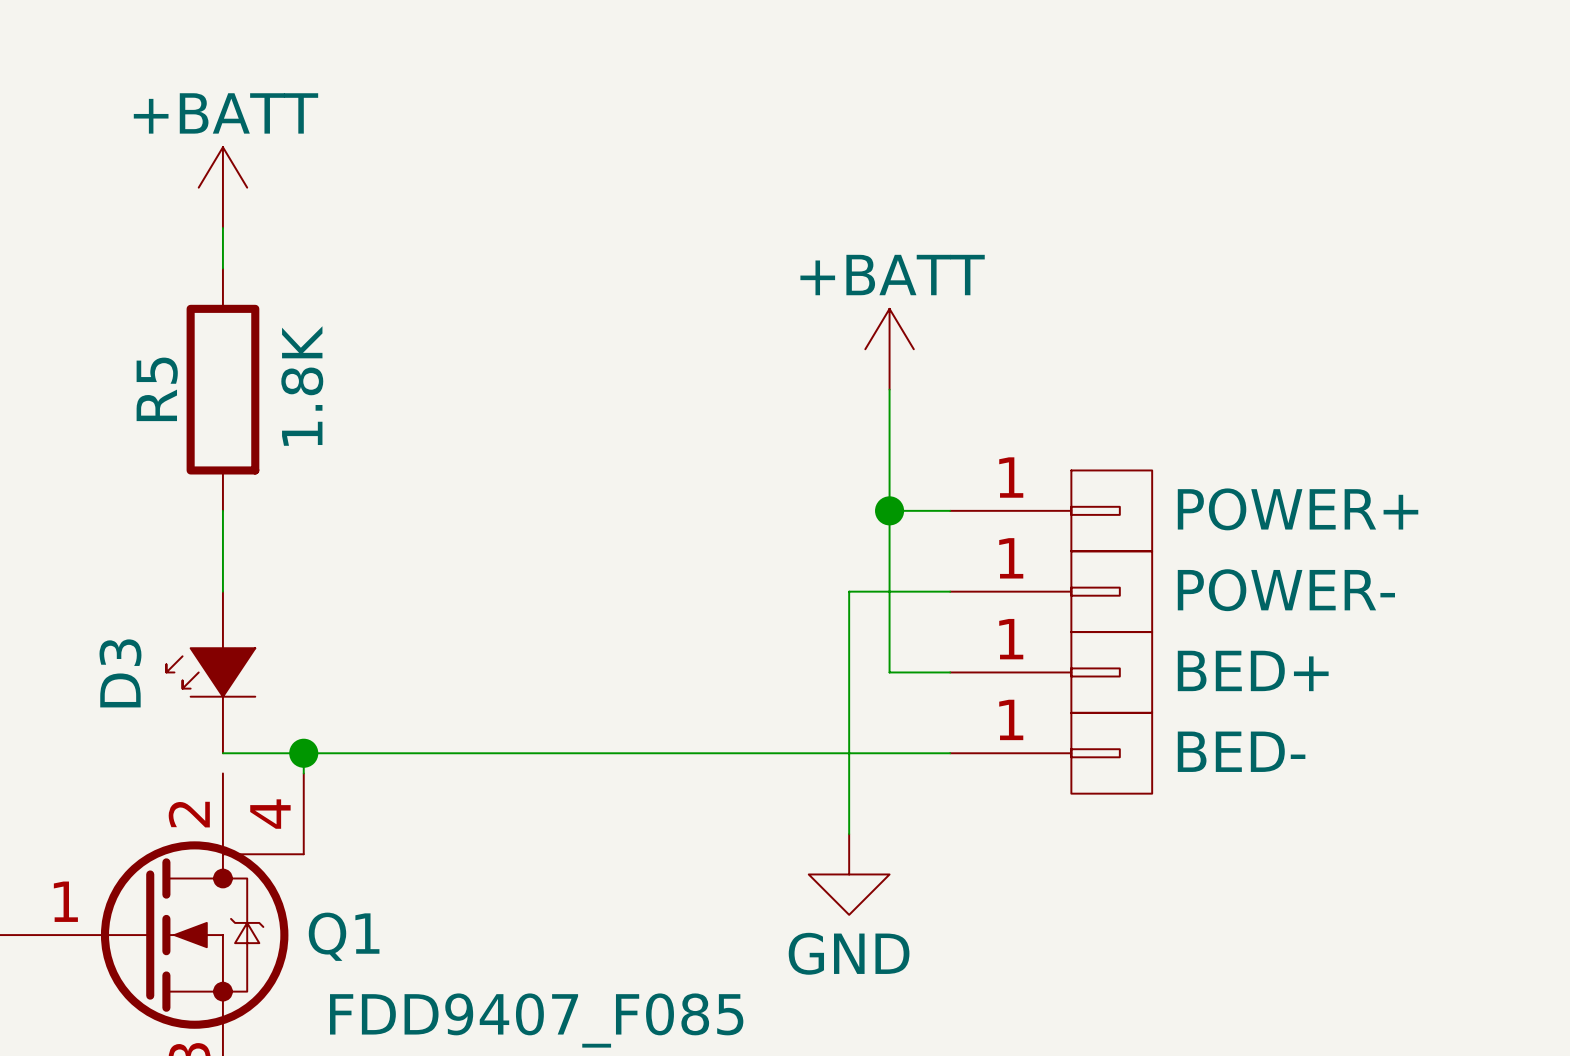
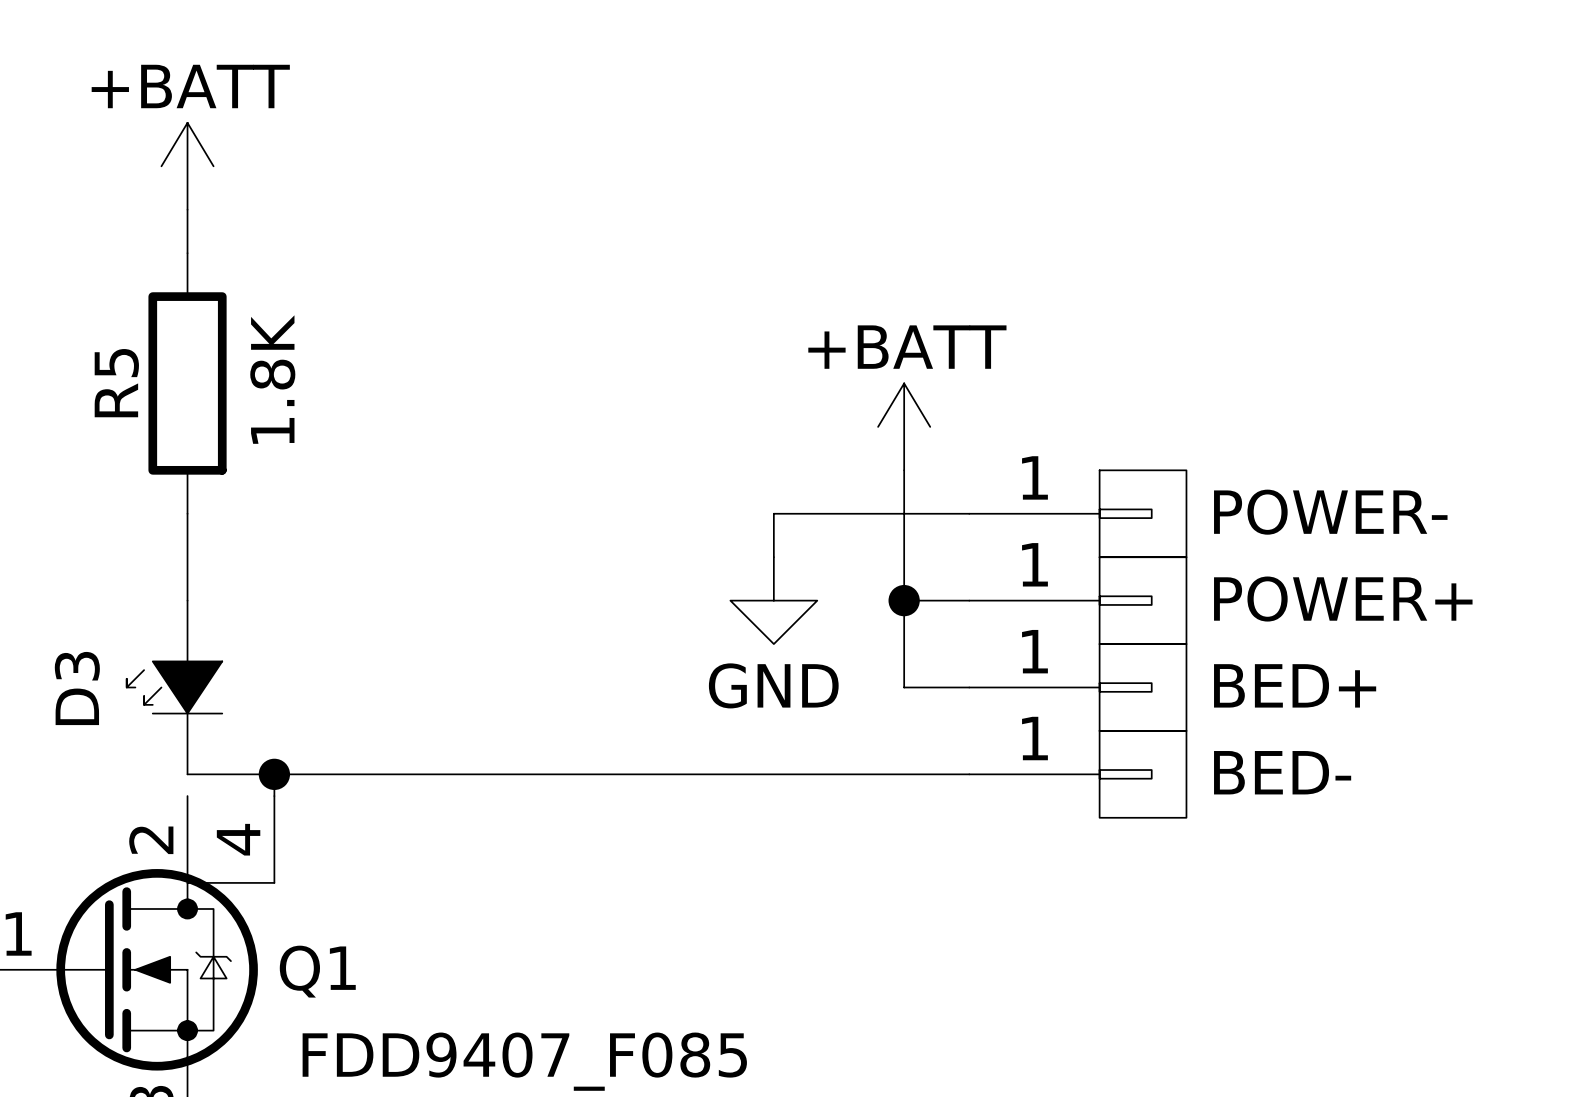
power symbol position: +BATT (889, 349) -> +BATT (904, 426)
POWER+ name: POWER+ (1298, 509) -> POWER- (1330, 512)
wire: none -> (904, 513) (773, 513) (773, 557)
junction position: (889, 510) -> (904, 600)
POWER- name: POWER- (1286, 590) -> POWER+ (1343, 599)
wire: (889, 591) (849, 591) (849, 834) -> none
power symbol position: GND (849, 874) -> GND (773, 600)

